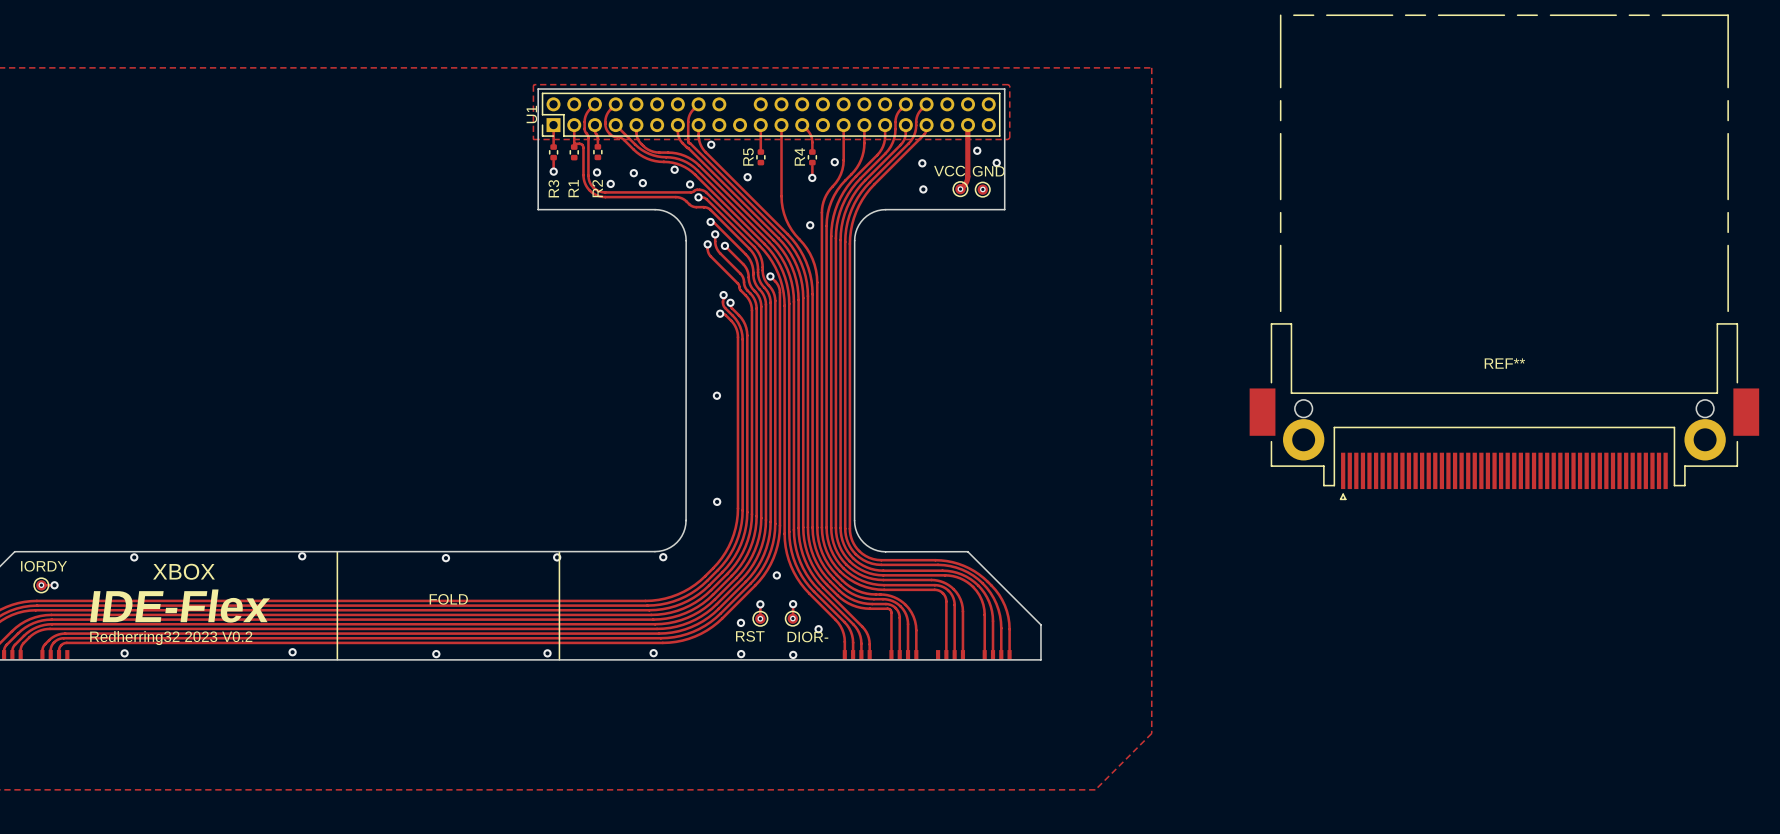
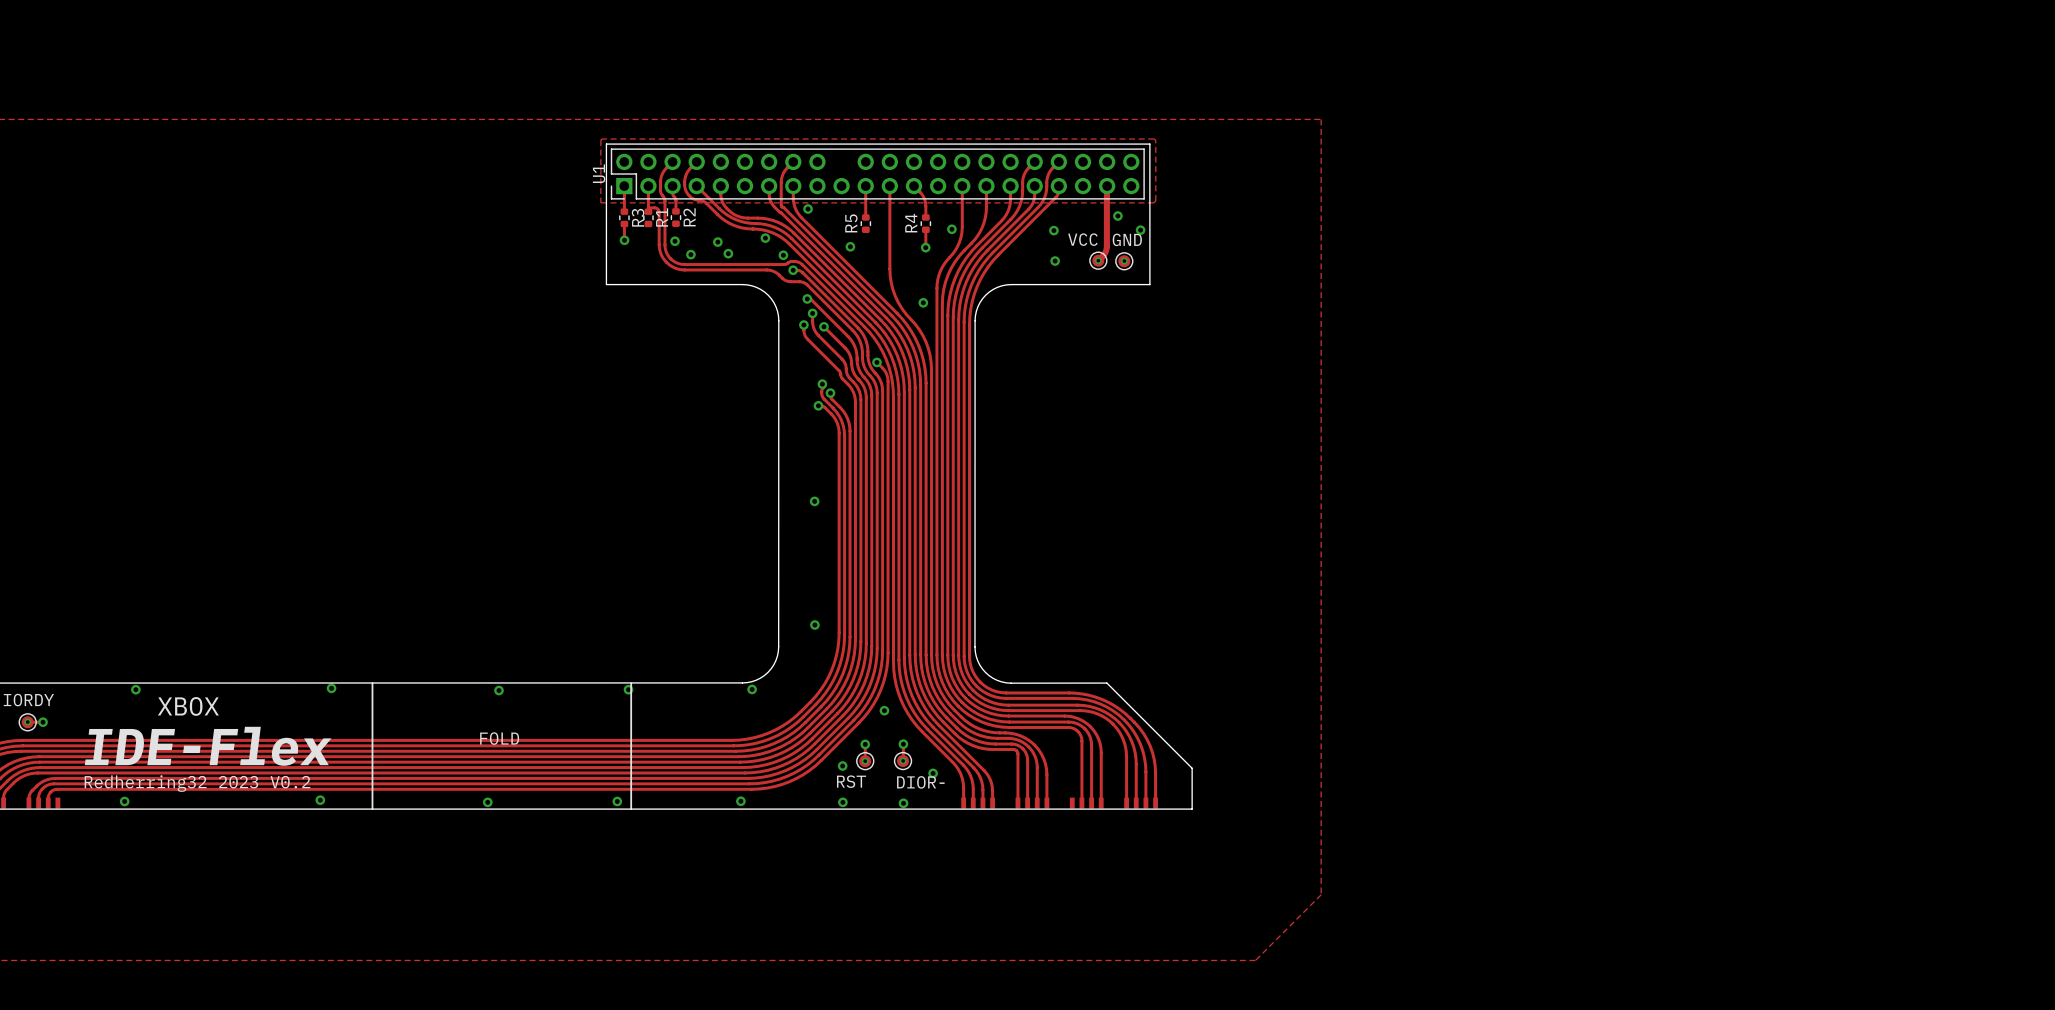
R3 name position: R3 (553, 188) -> R3 (638, 217)
R1 name position: R1 (573, 188) -> R1 (662, 217)
R2 name position: R2 (597, 188) -> R2 (689, 217)
REF**: (1504, 257) -> none

